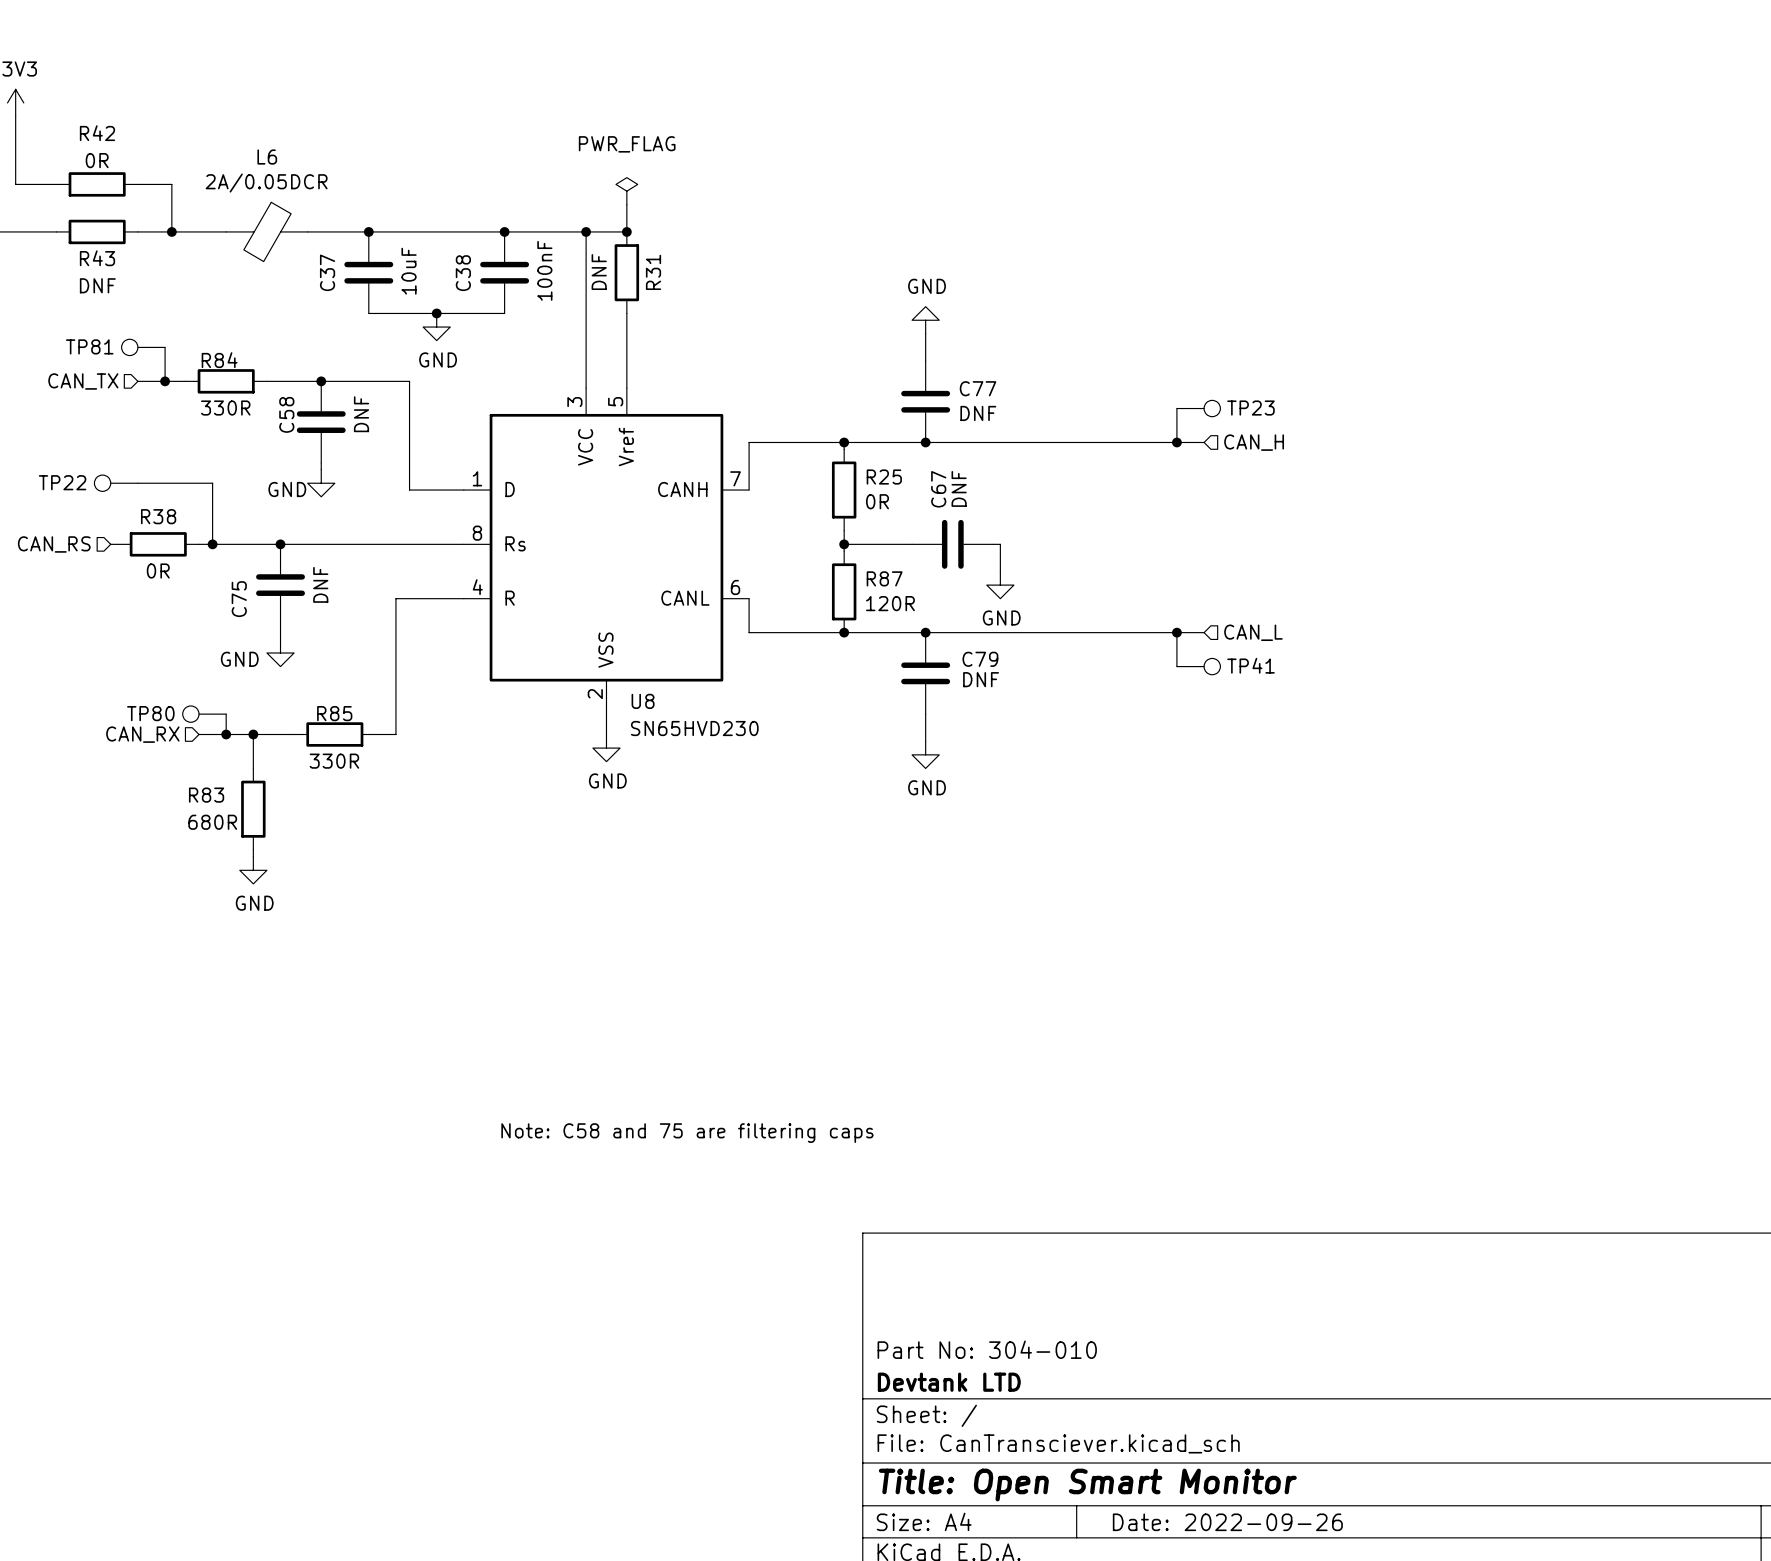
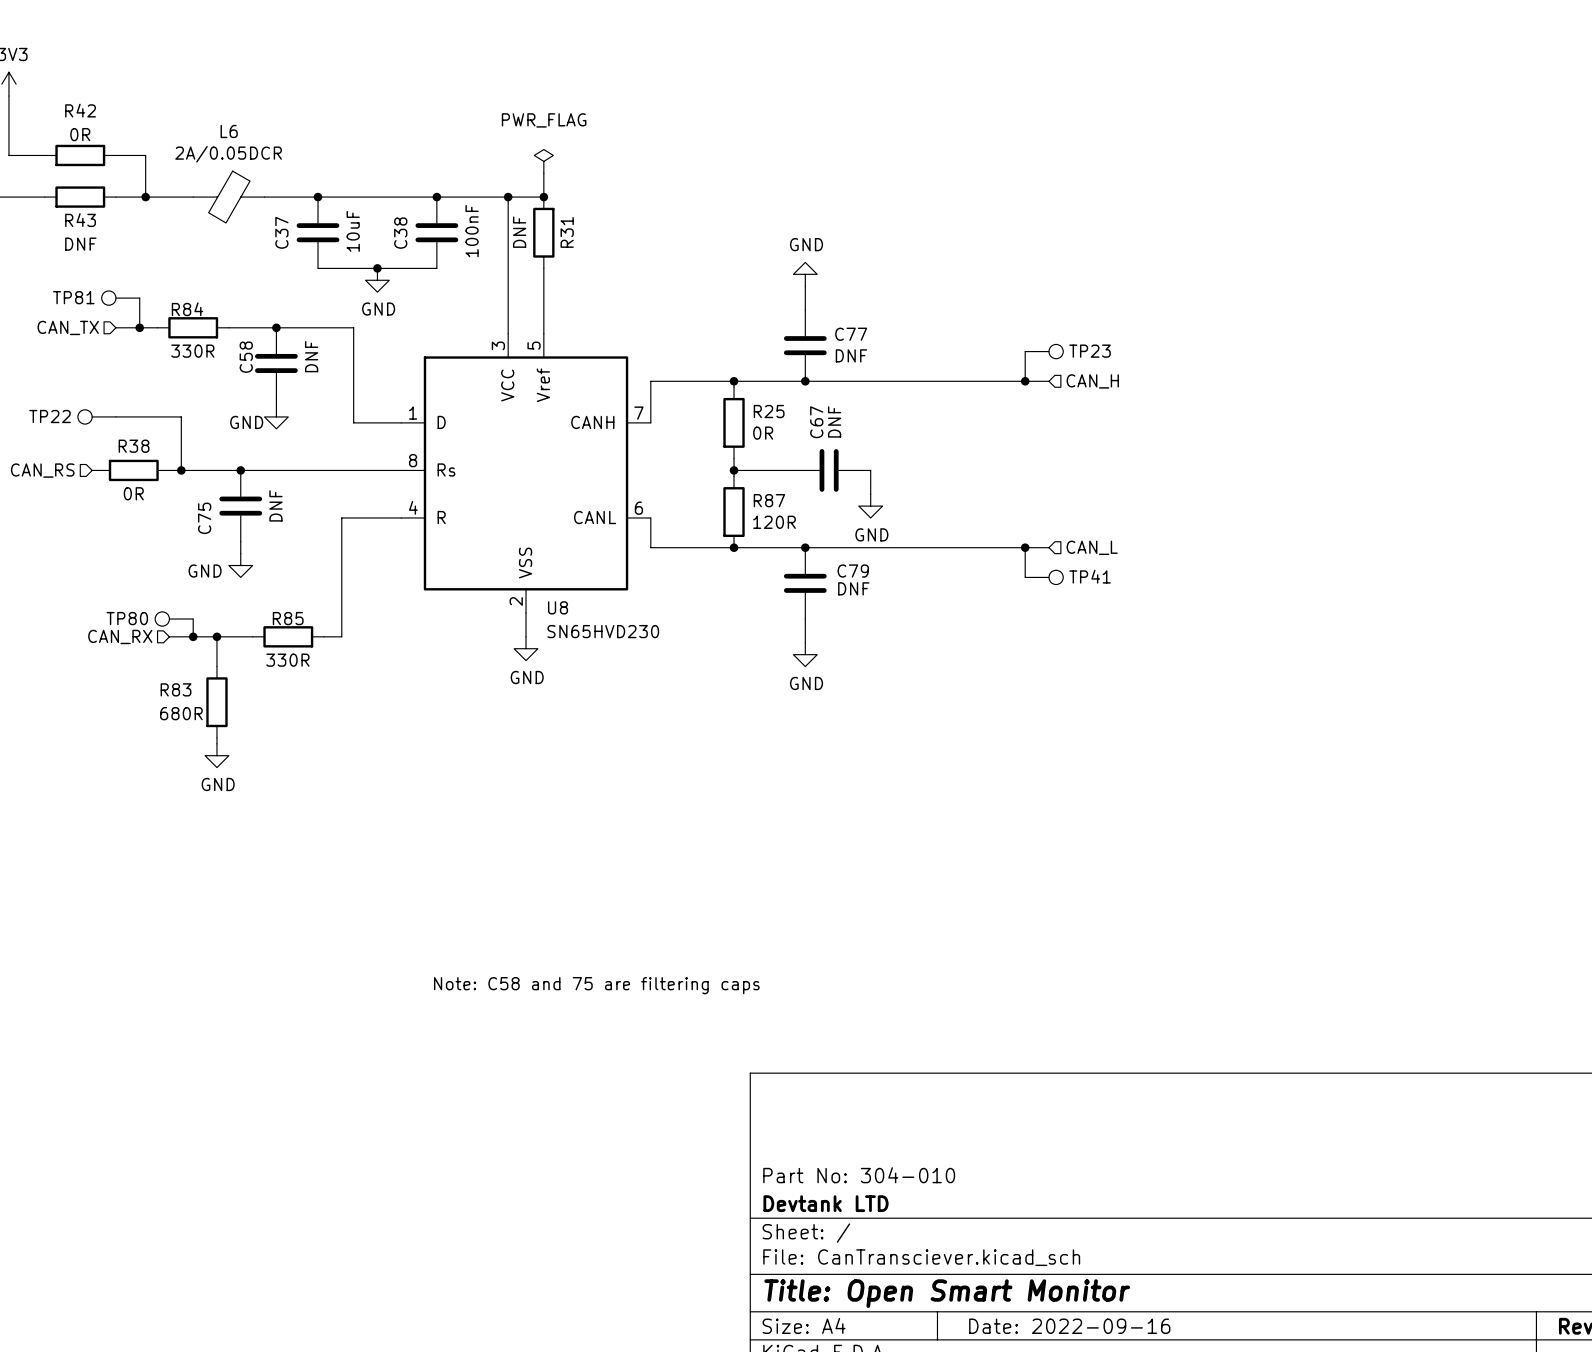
title block: Date: 2022-09-26 (1227, 1522) -> Date: 2022-09-16 (1069, 1326)

